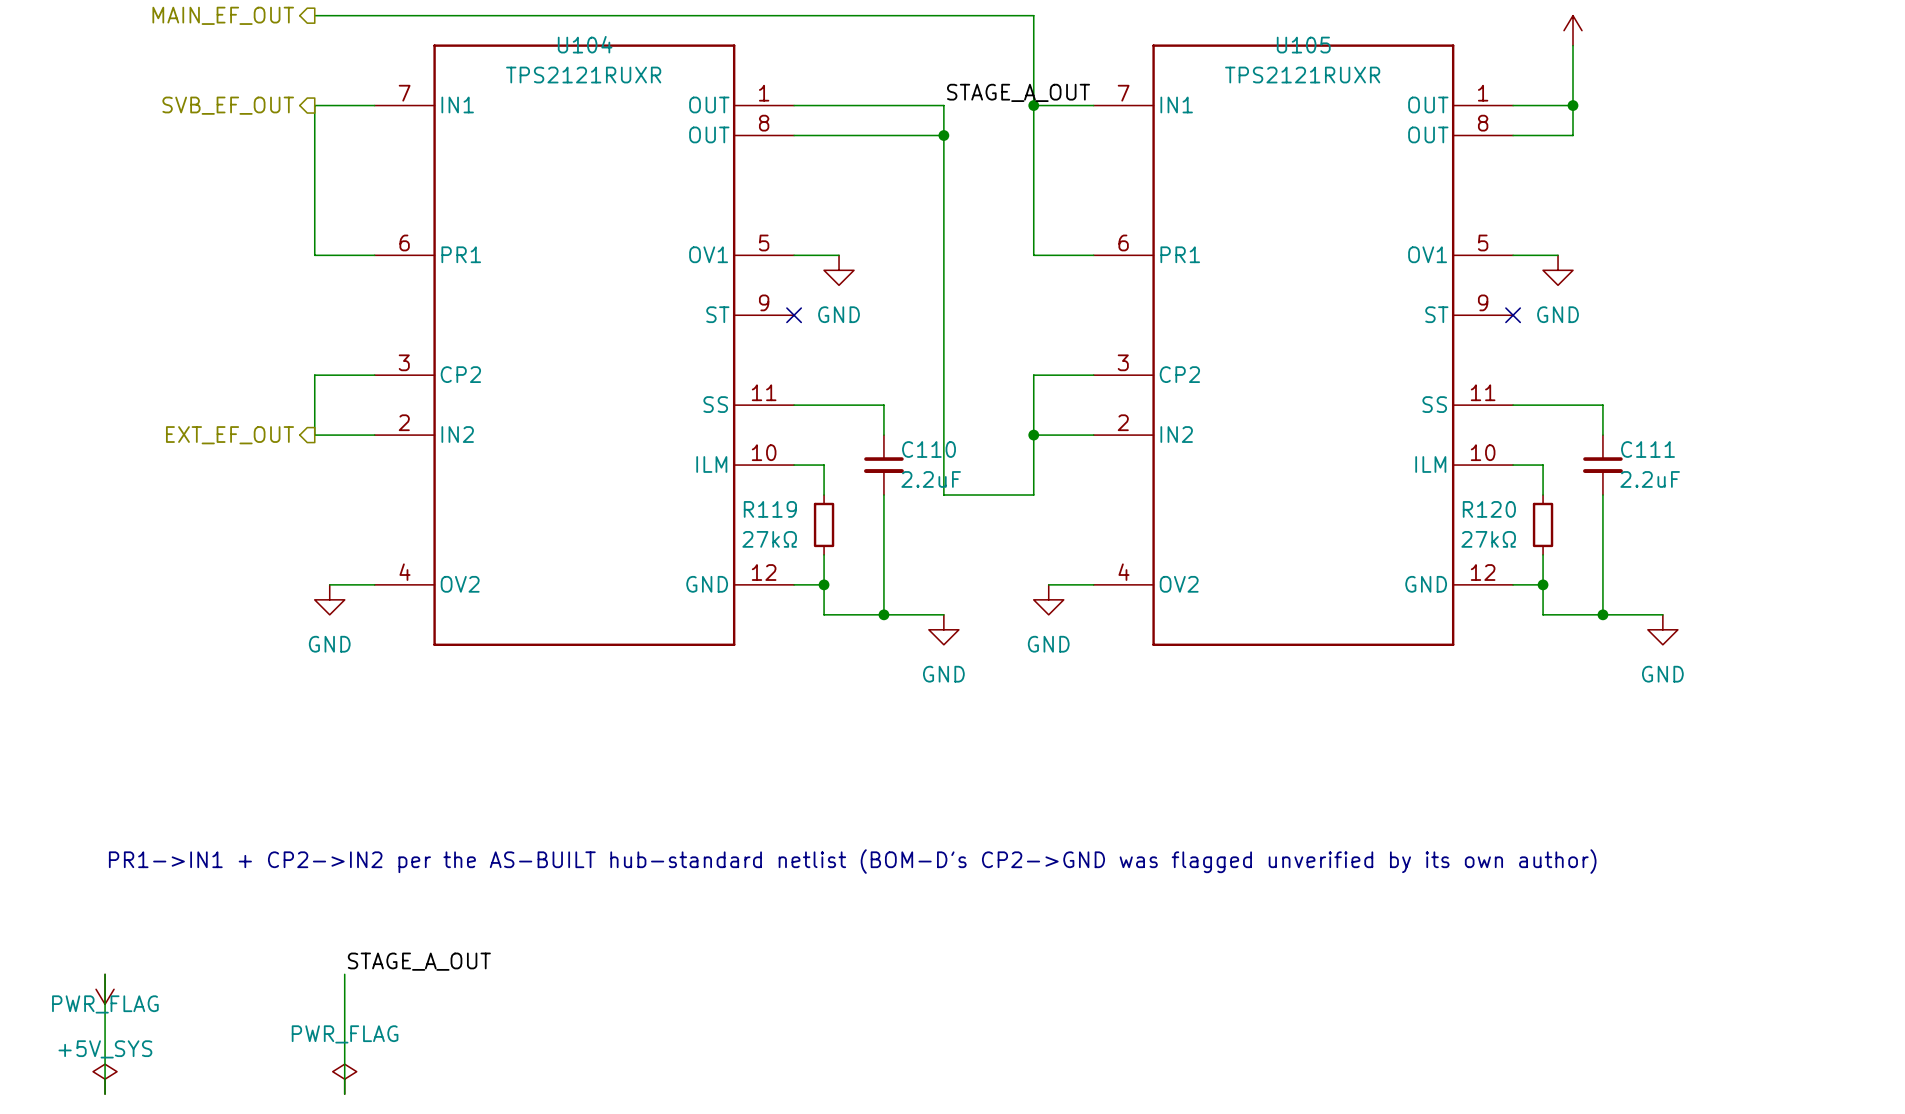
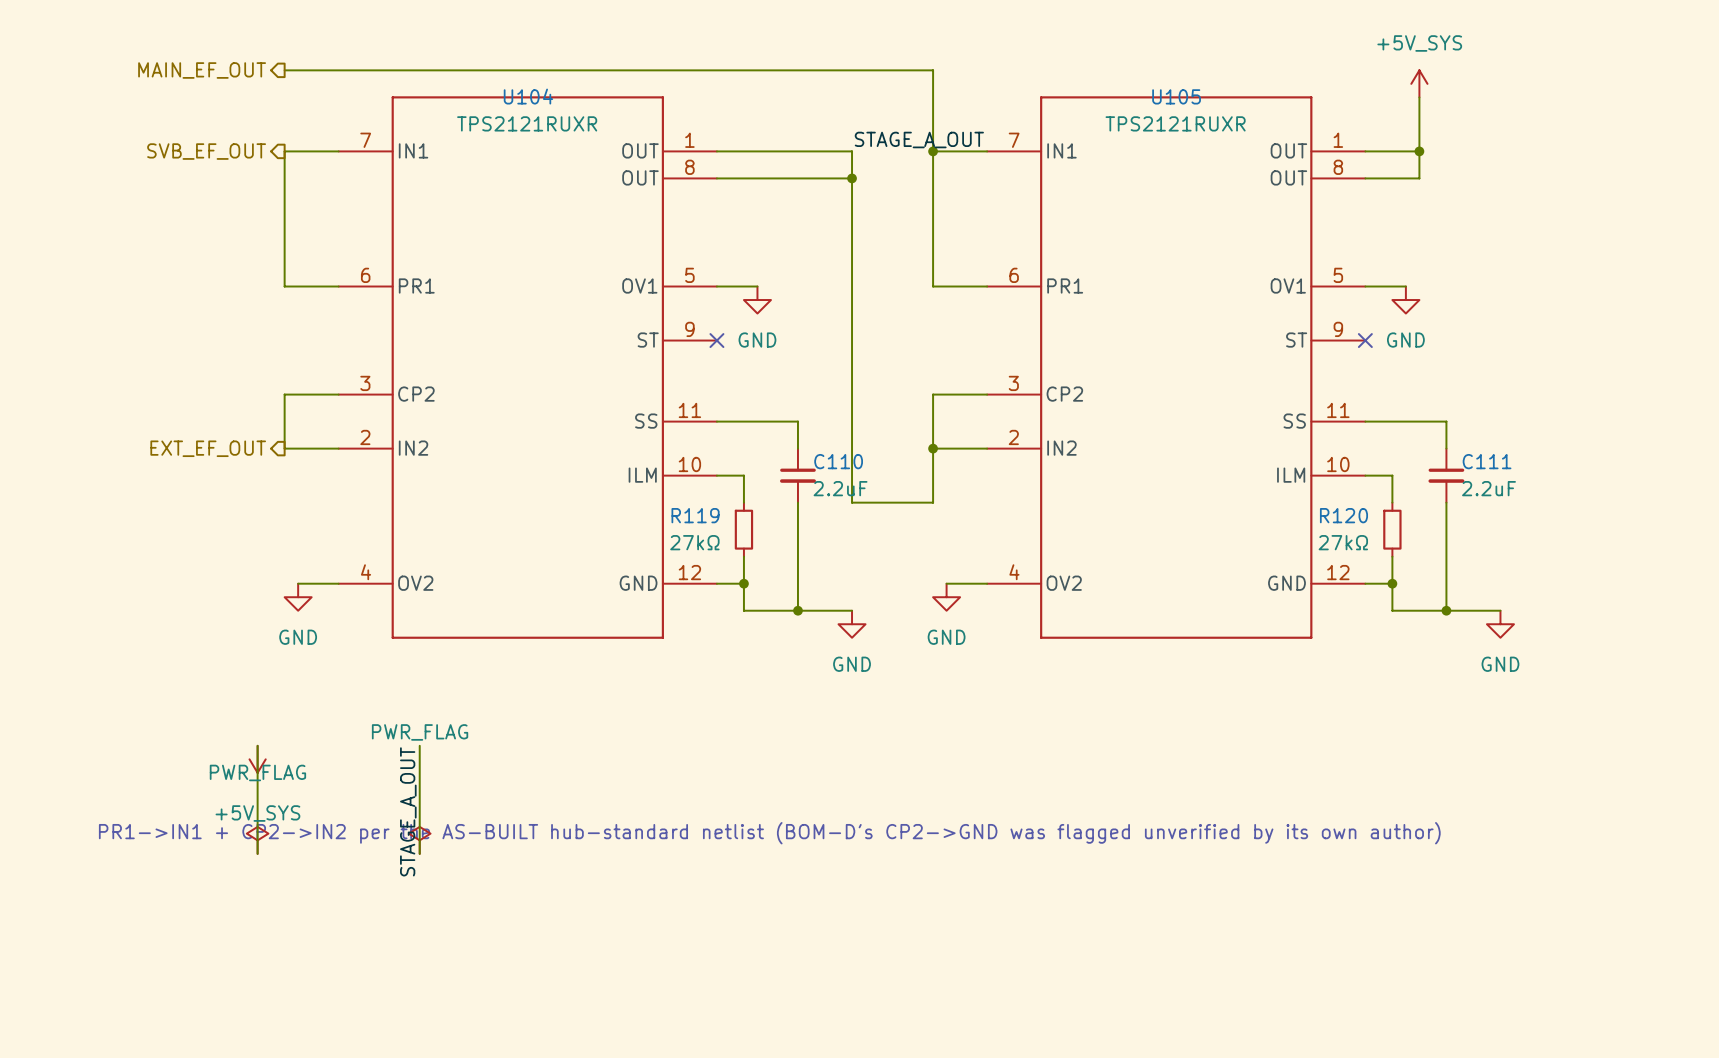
wire: none -> (419, 745) (419, 853)
power symbol: none -> PWR_FLAG (257, 840)
power symbol: none -> PWR_FLAG (419, 840)
label rotation: 0° (419, 961) -> 90° counterclockwise (408, 811)
wire: (105, 974) (105, 1094) -> none
wire: (344, 974) (344, 1094) -> (257, 745) (257, 853)
power symbol position: +5V_SYS (105, 989) -> +5V_SYS (257, 759)
power symbol: PWR_FLAG (105, 1079) -> none
power symbol: PWR_FLAG (344, 1079) -> none

